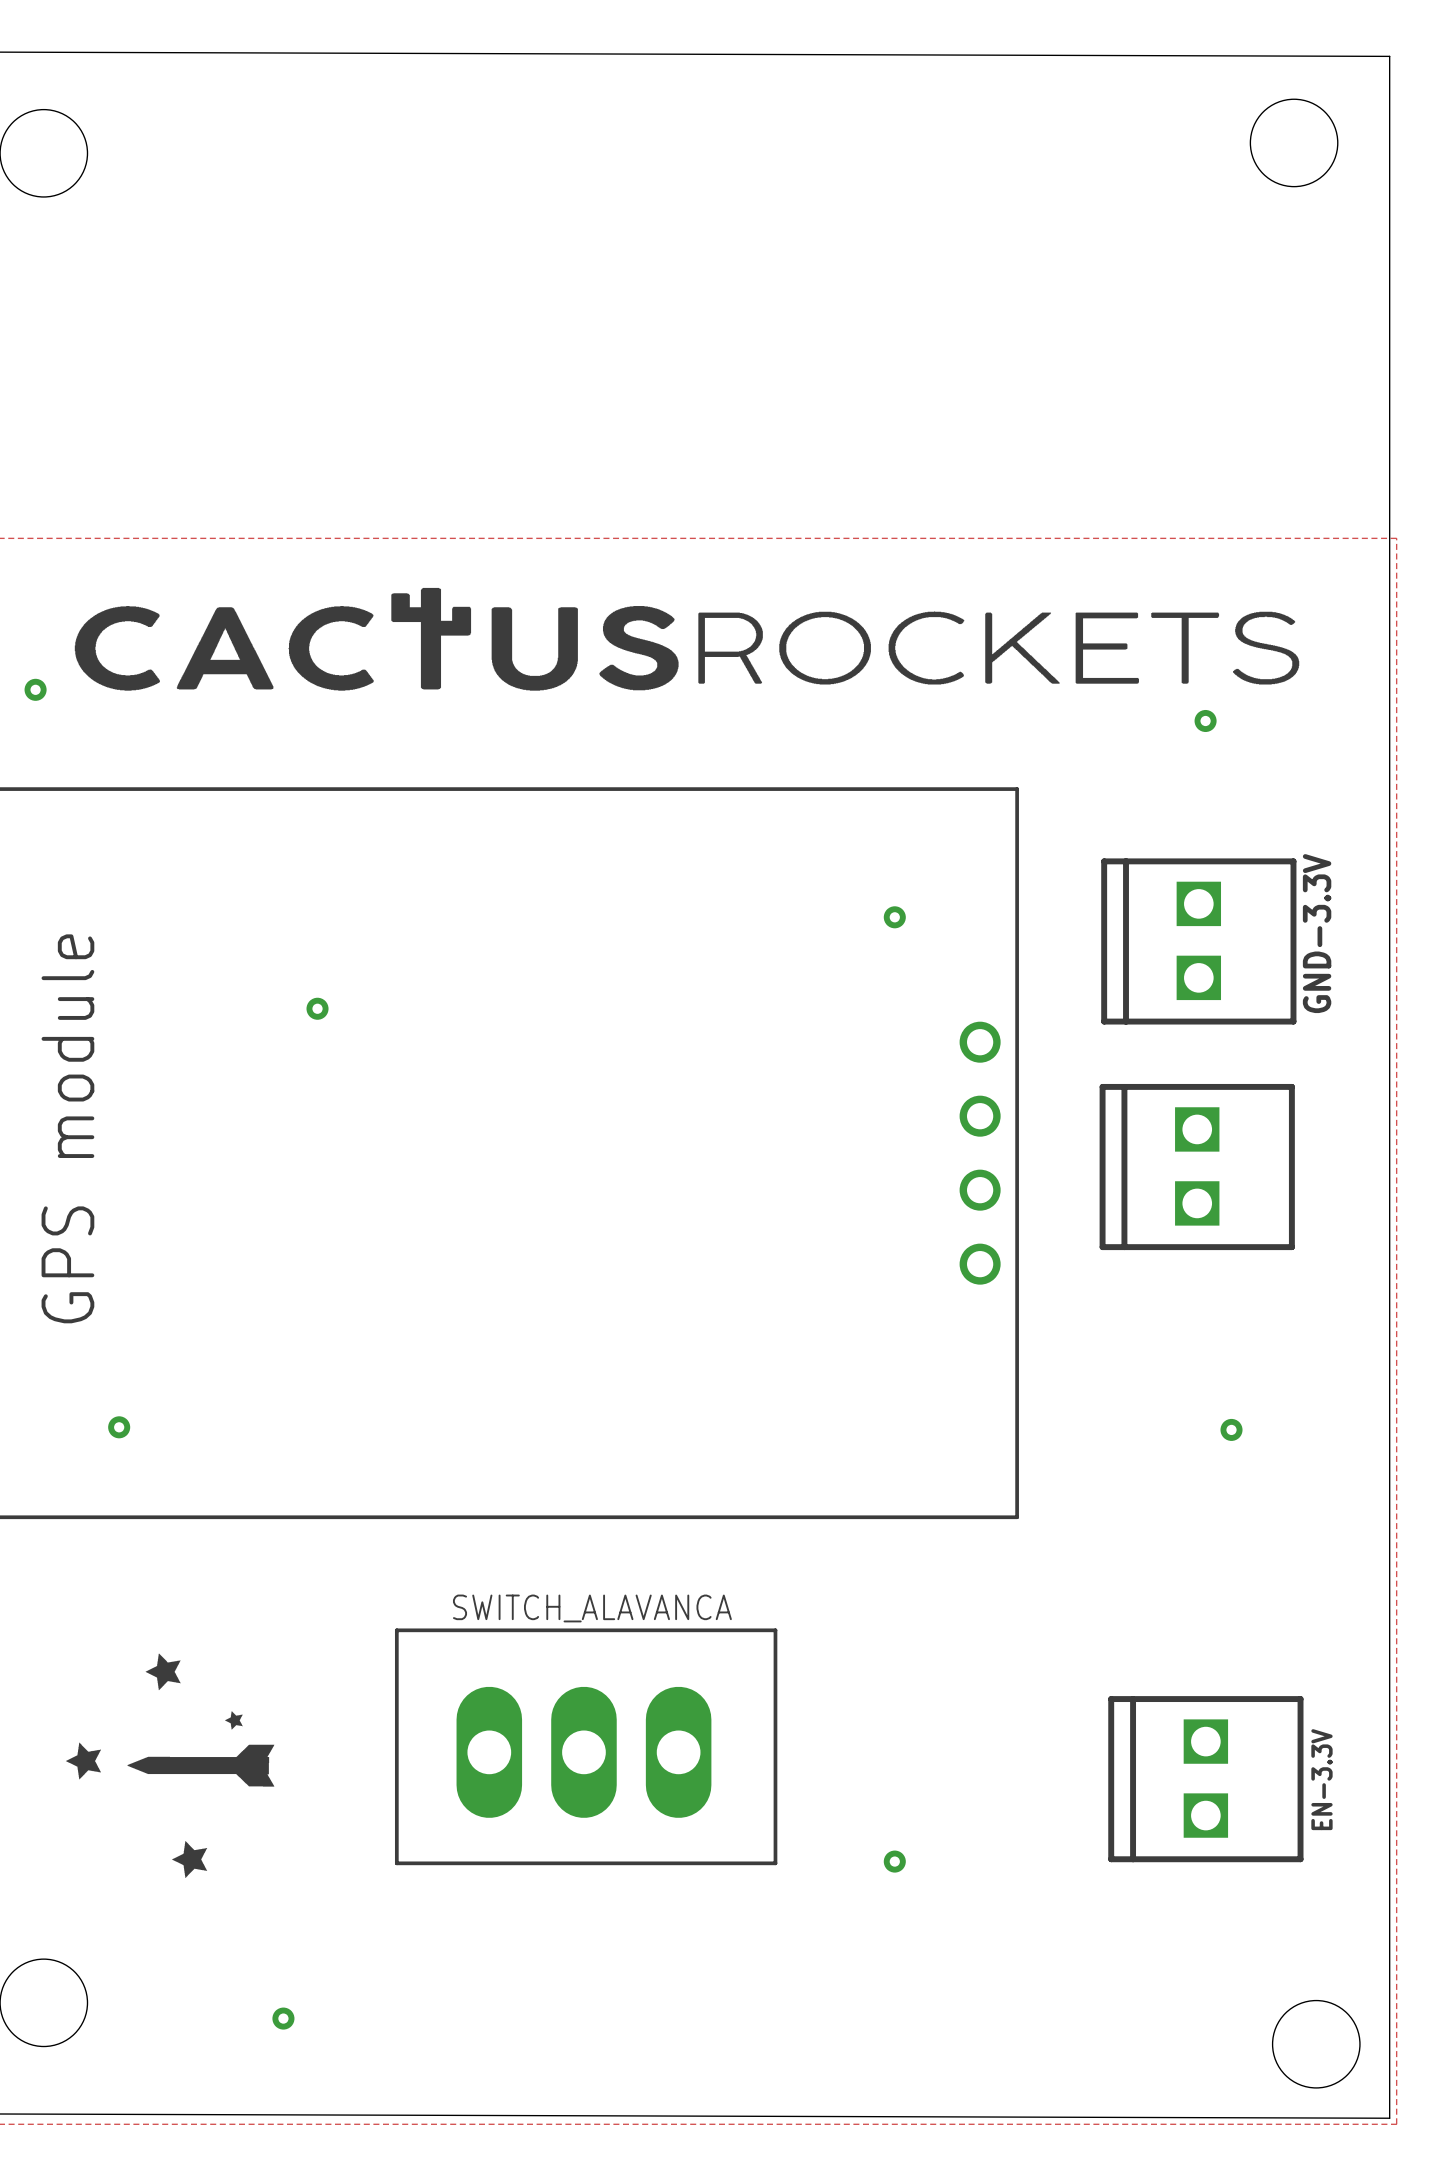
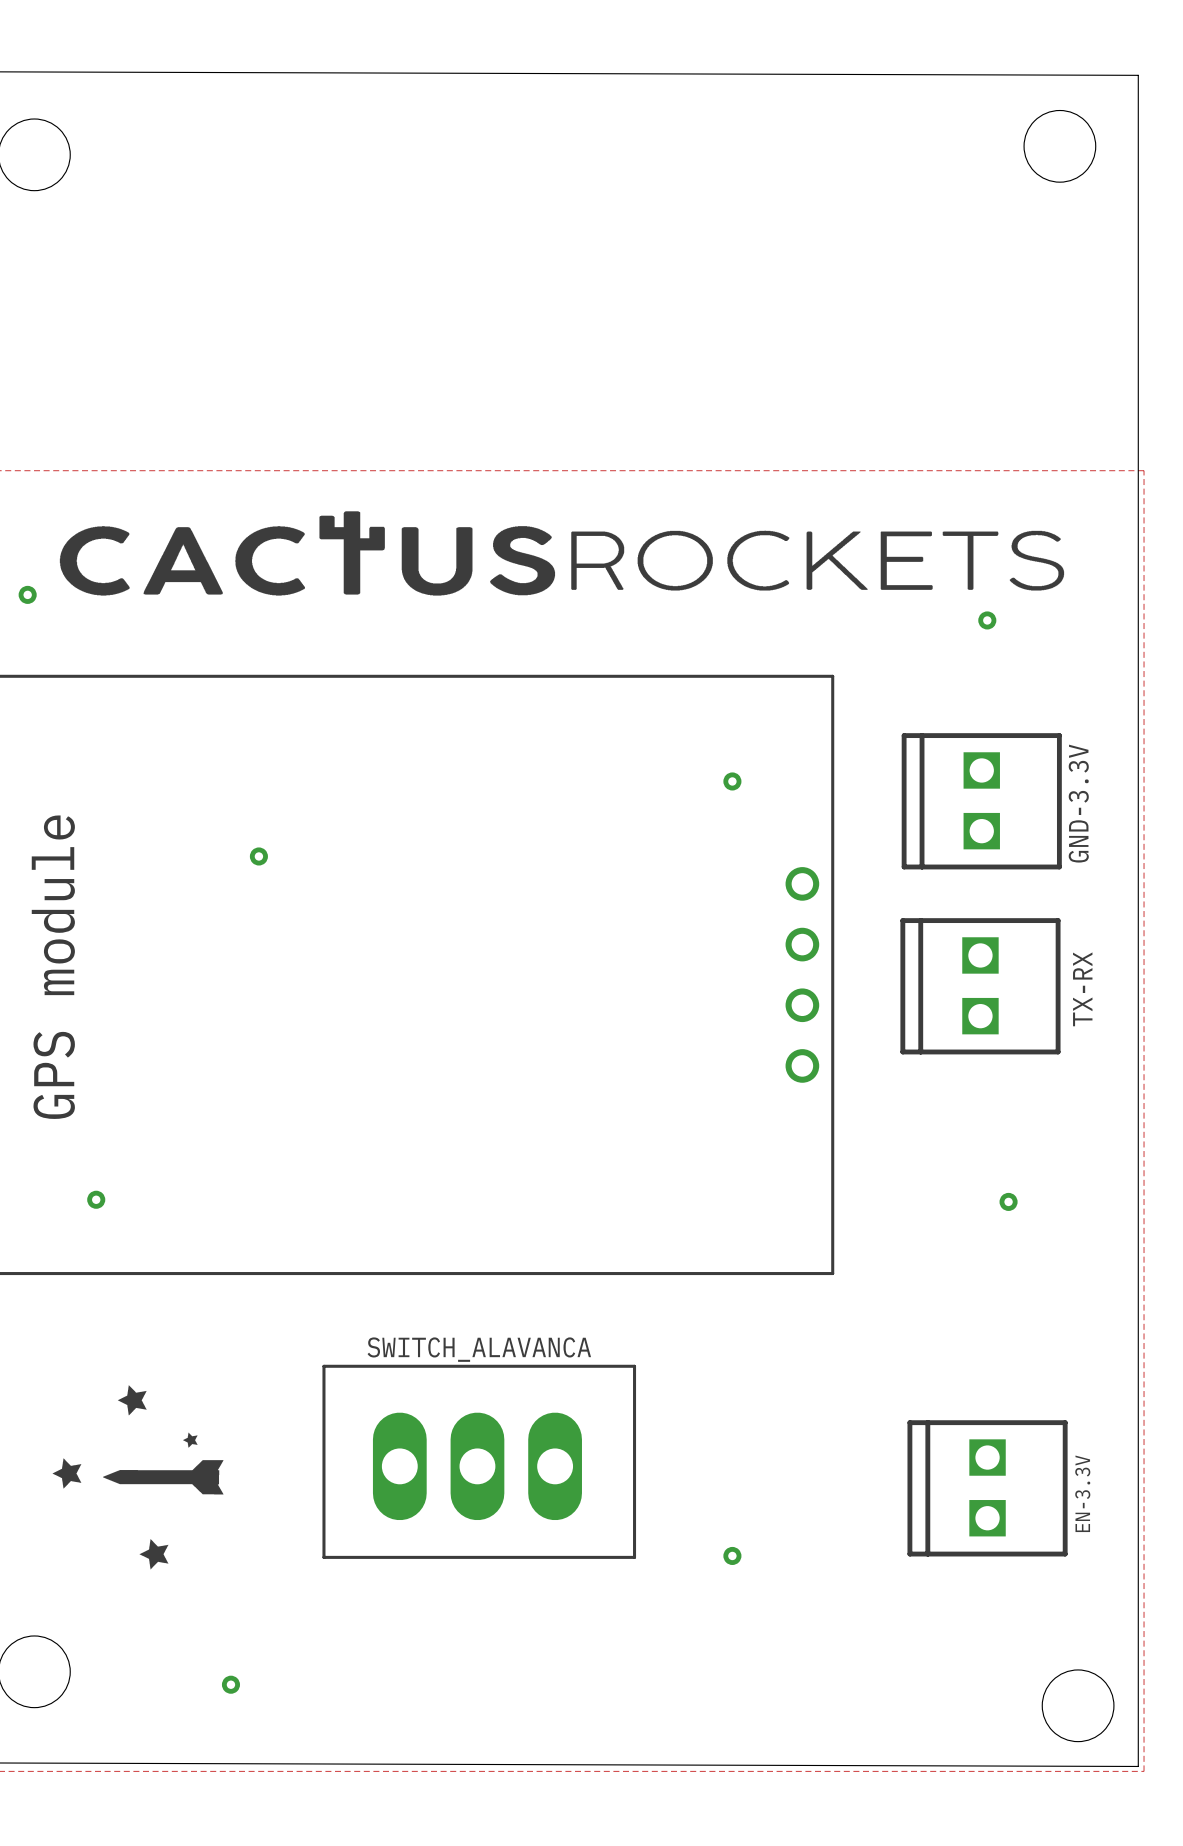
TX-RX name: none -> TX-RX (1082, 989)

